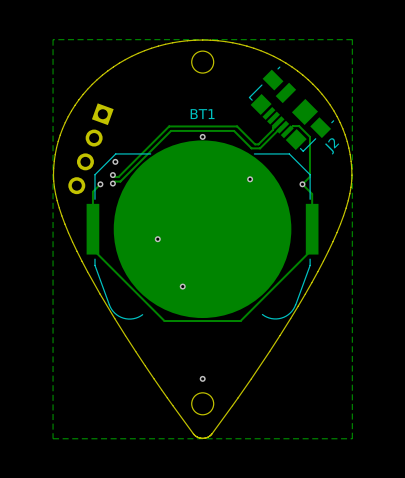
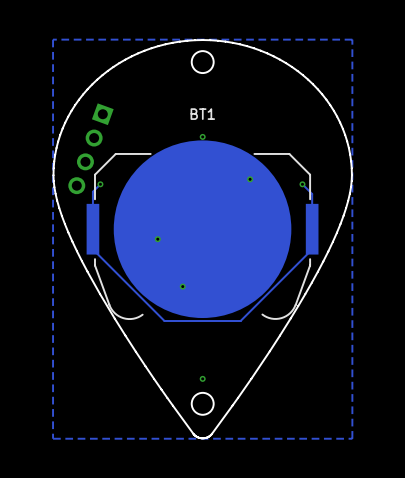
J2: (291, 109) -> none
track: (278, 122) (258, 144) (255, 144) (237, 126) (169, 126) (118, 177) (112, 175) -> none
track: (282, 127) (260, 148) (251, 148) (234, 130) (171, 130) (120, 181) (112, 183) -> none
track: (287, 131) (292, 126) (299, 126) (309, 136) (309, 176) (302, 184) -> none
via: (115, 161) -> none
via: (112, 175) -> none
via: (112, 183) -> none

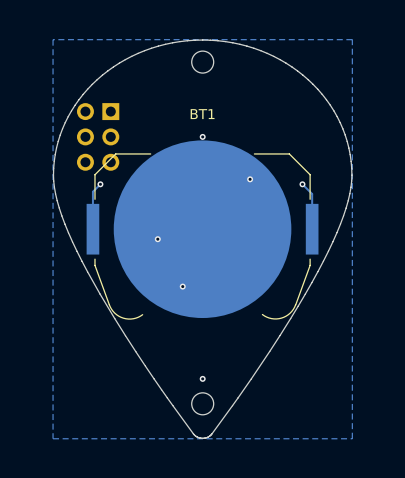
part: none -> (98, 136)
part: (90, 148) -> none
track: (312, 229) (312, 249) (240, 321) (164, 321) (92, 249) (92, 229) -> none

